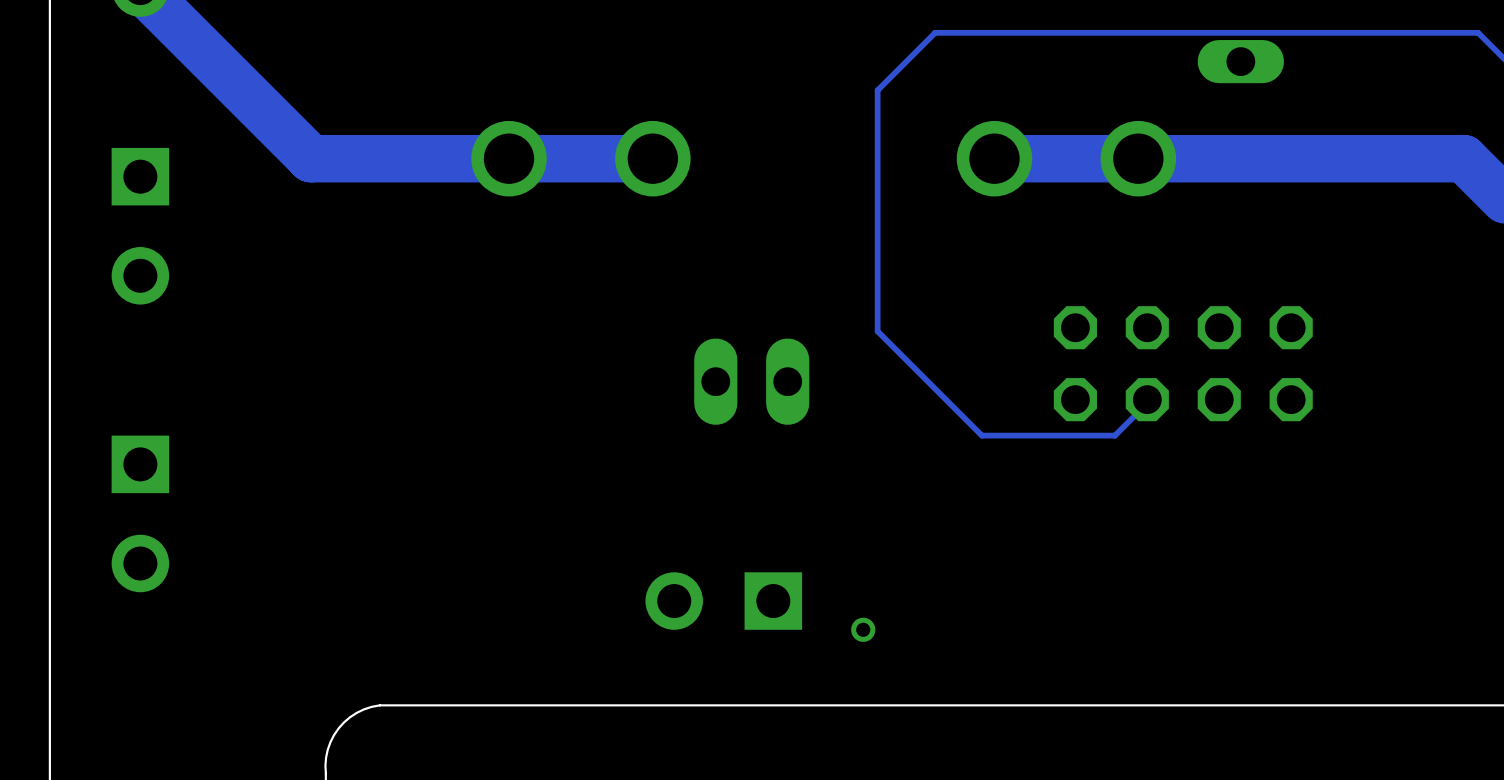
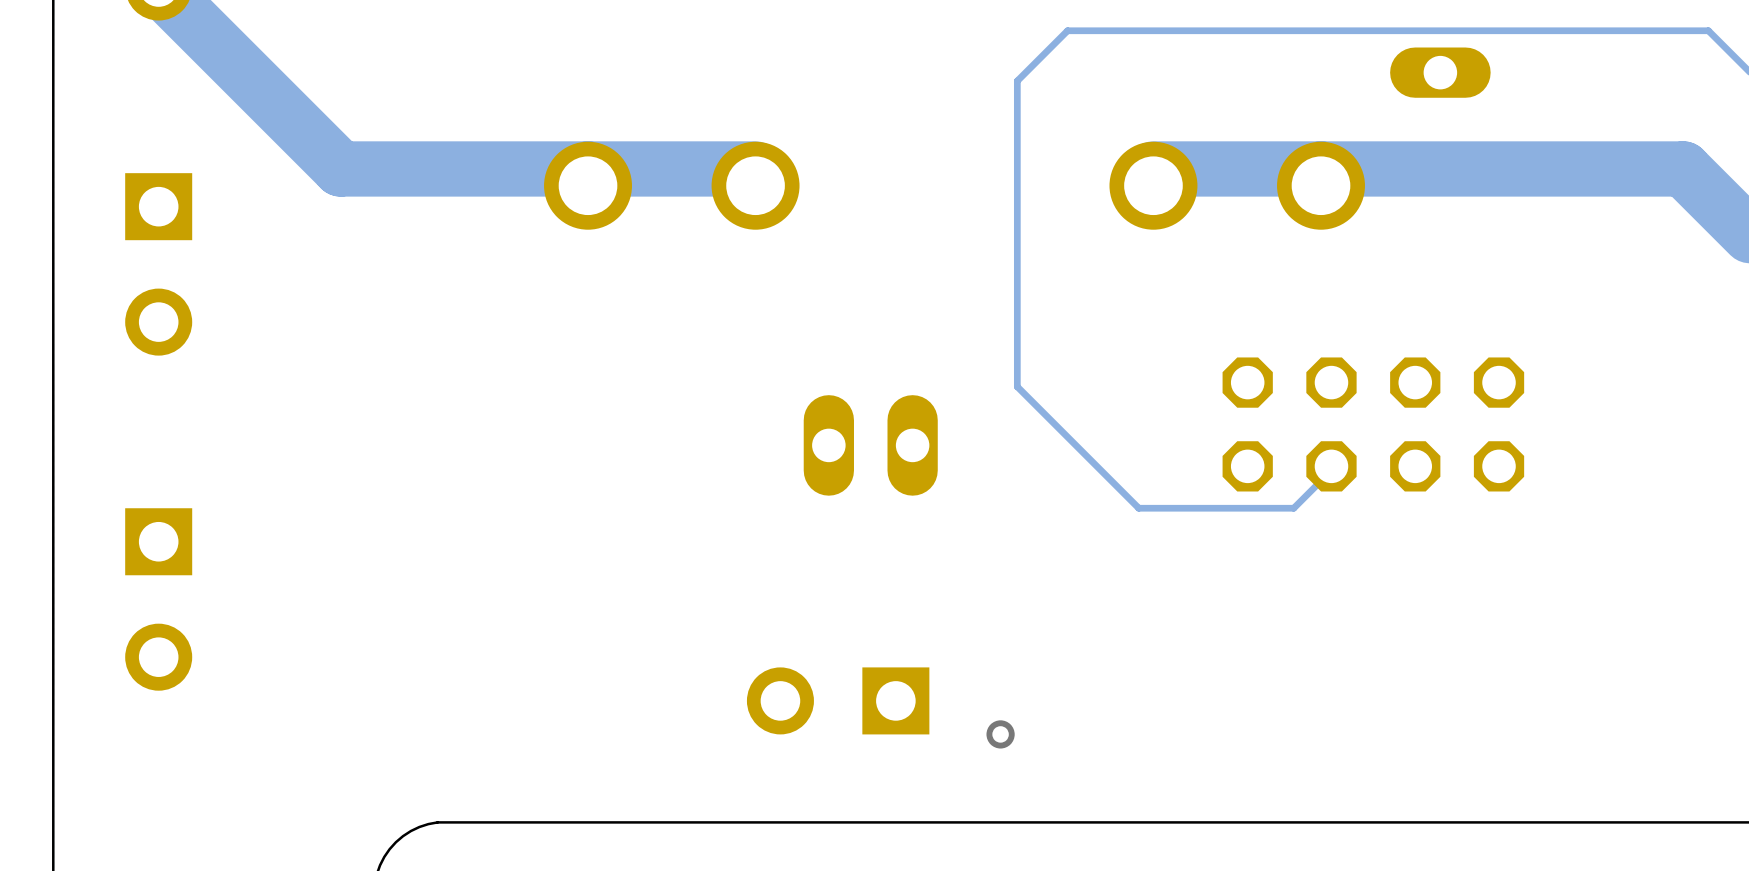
track: (1478, 32) (935, 32) (877, 90) -> (1716, 39) (1708, 30) (1067, 30) (1017, 81) (1017, 106)
track: (296, 144) (310, 158) (652, 158) -> (340, 168) (755, 168)
track: (1463, 158) (994, 158) -> (1700, 185) (1683, 168) (1153, 168)

